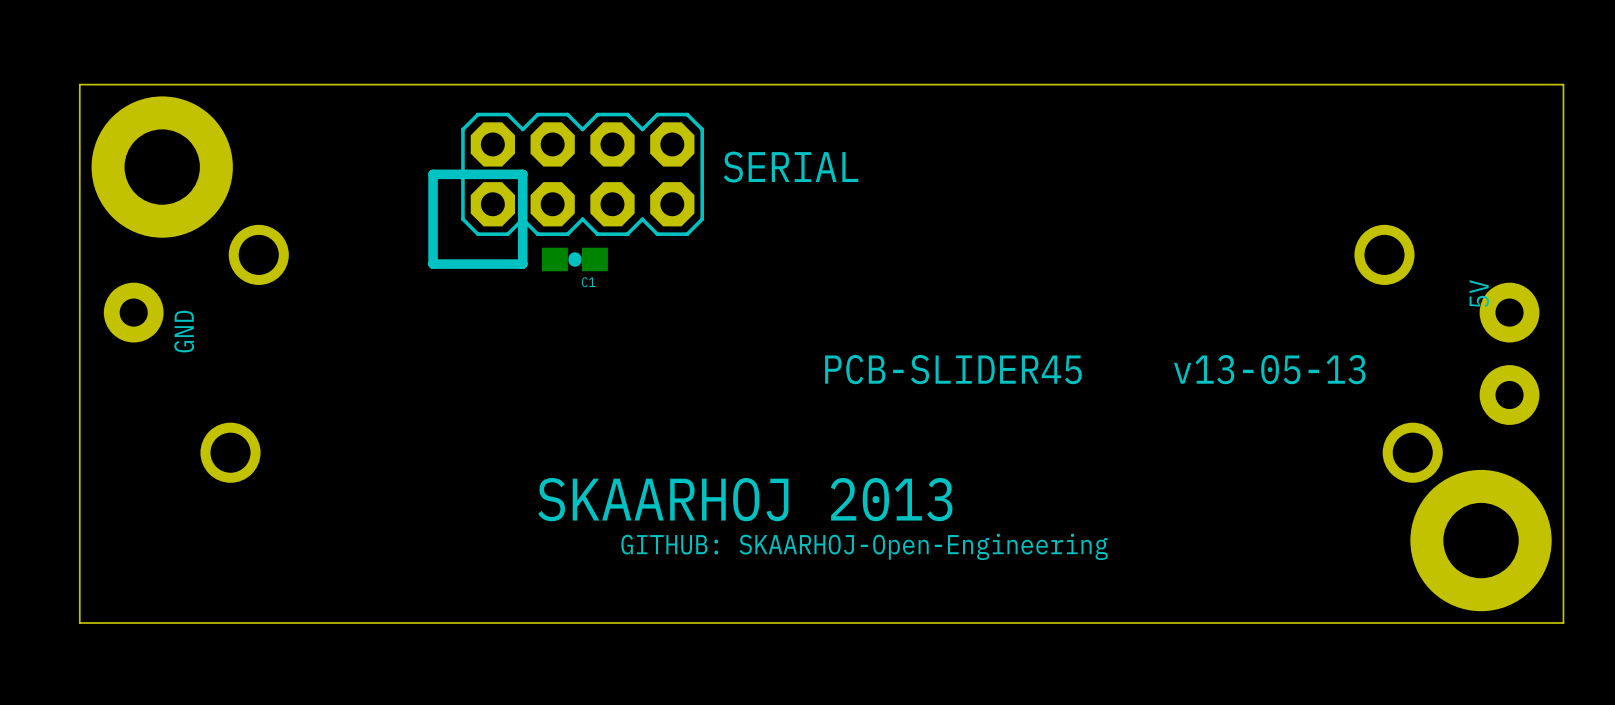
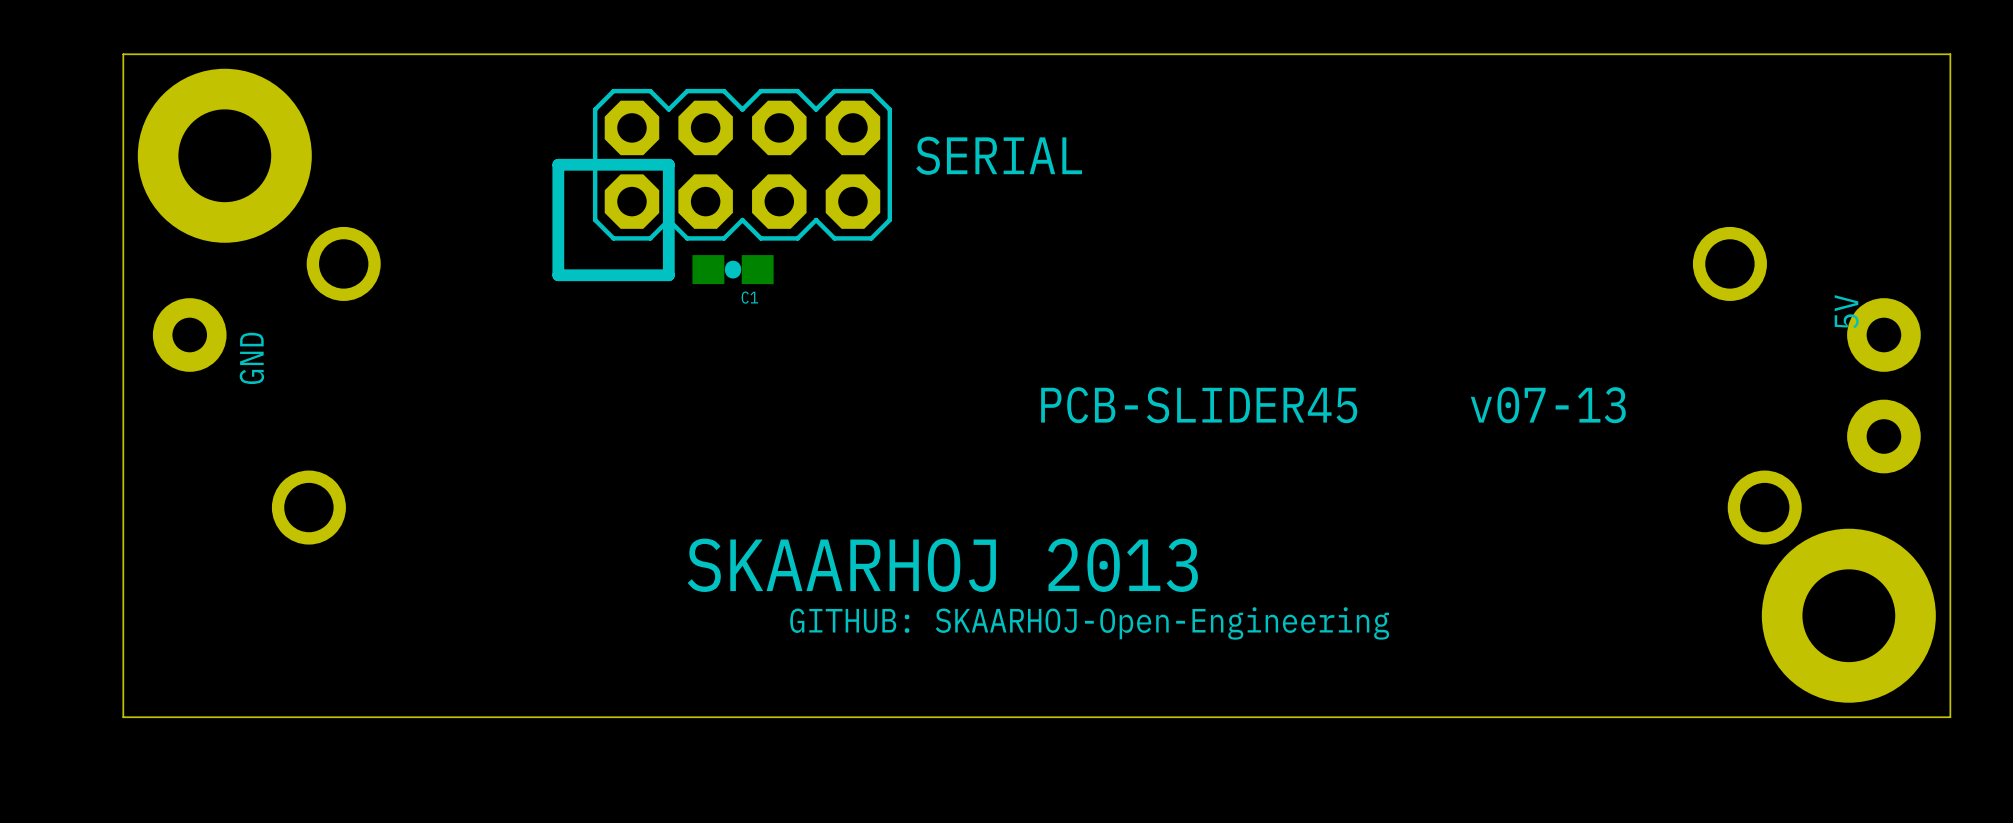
text: PCB-SLIDER45 v13-05-13 (1095, 369) -> PCB-SLIDER45 v07-13 (1333, 405)

